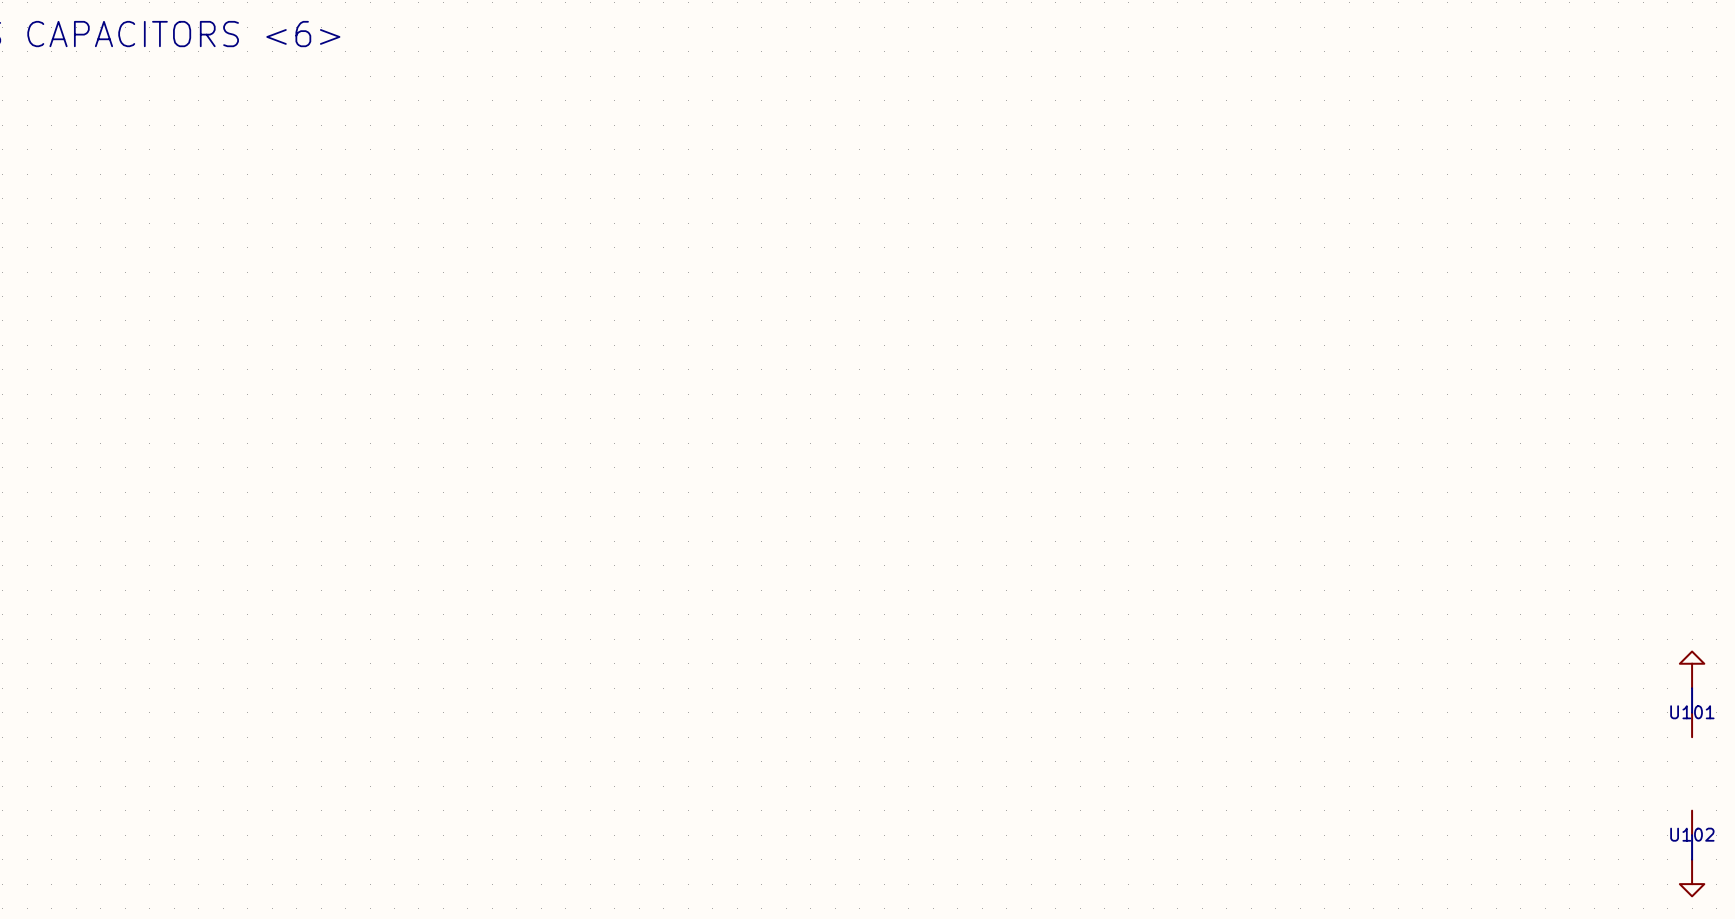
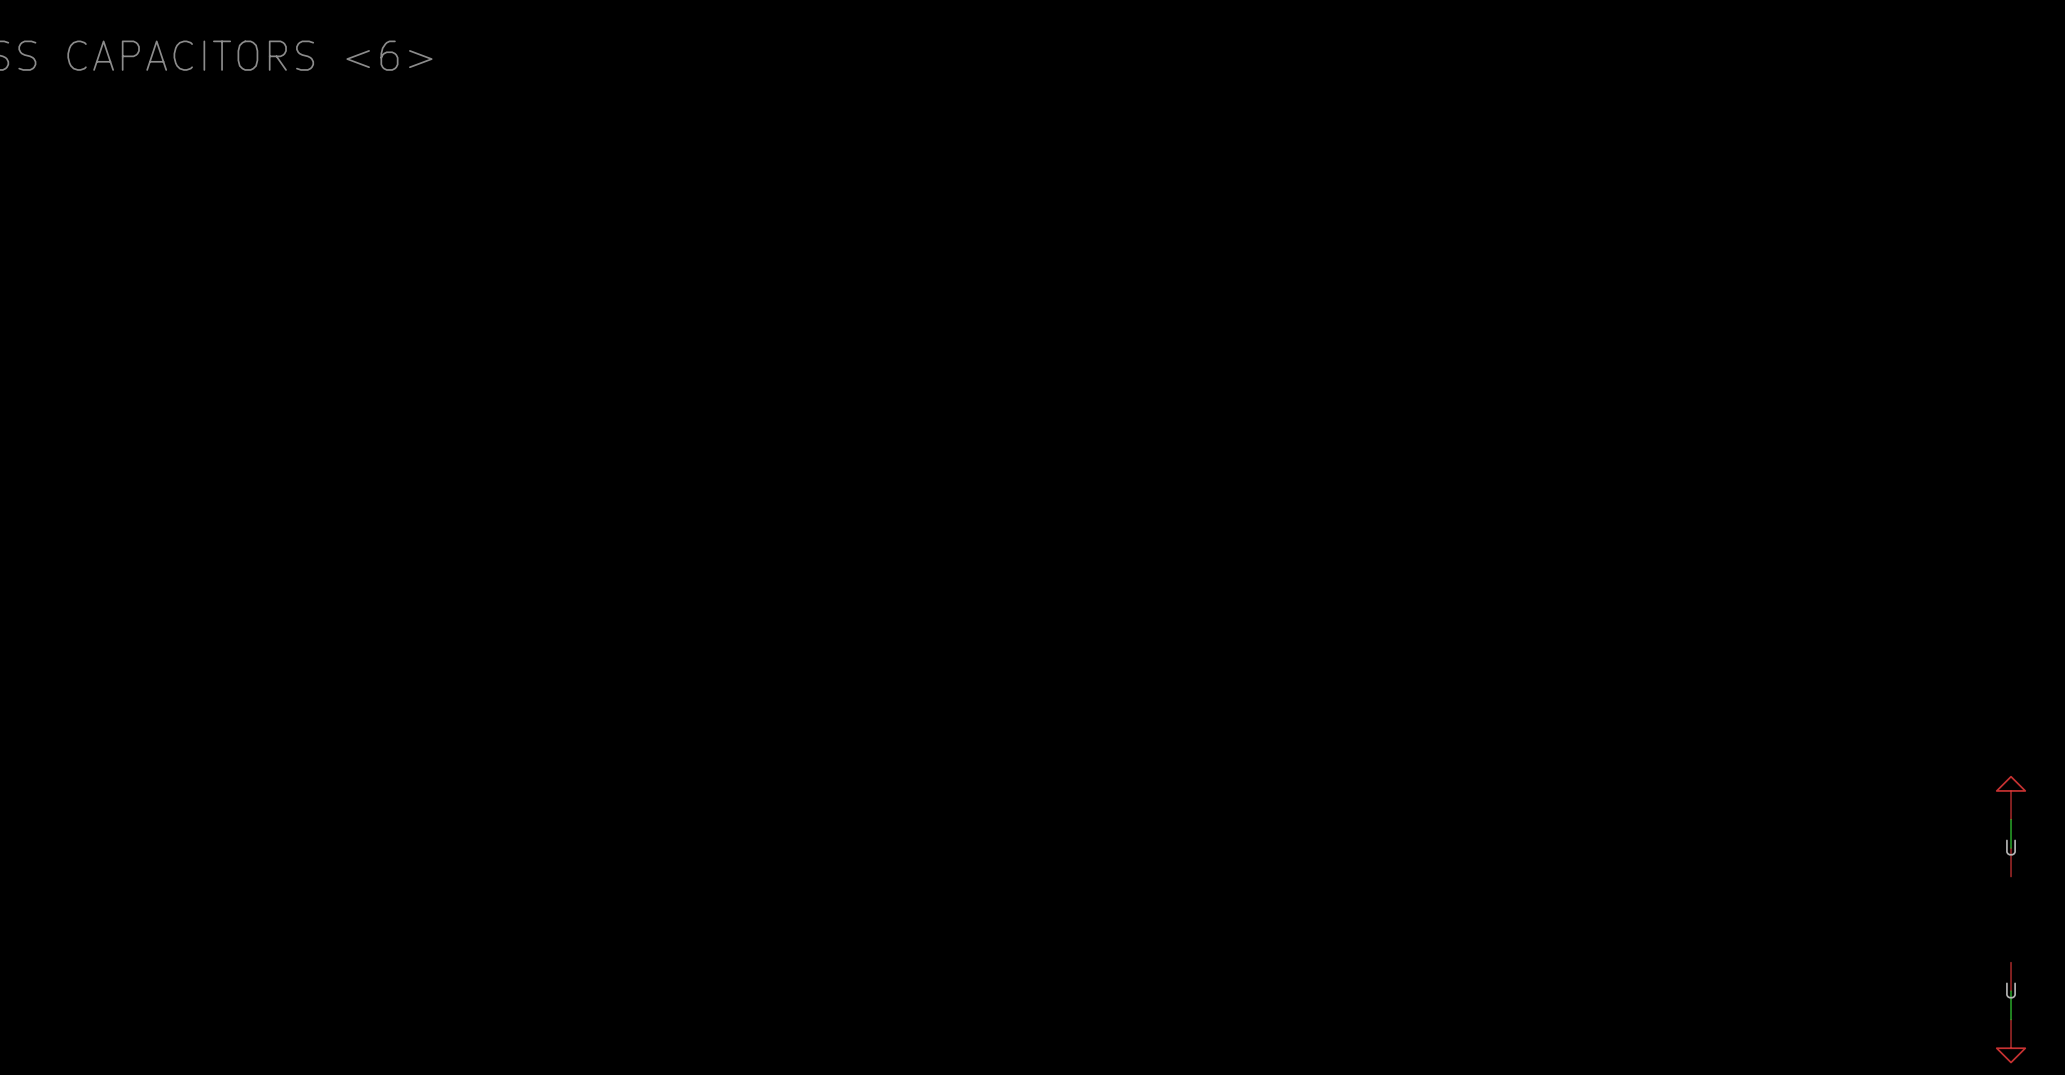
U101 name: U101 (1692, 712) -> U (2011, 847)
U102 name: U102 (1692, 834) -> U (2011, 990)

